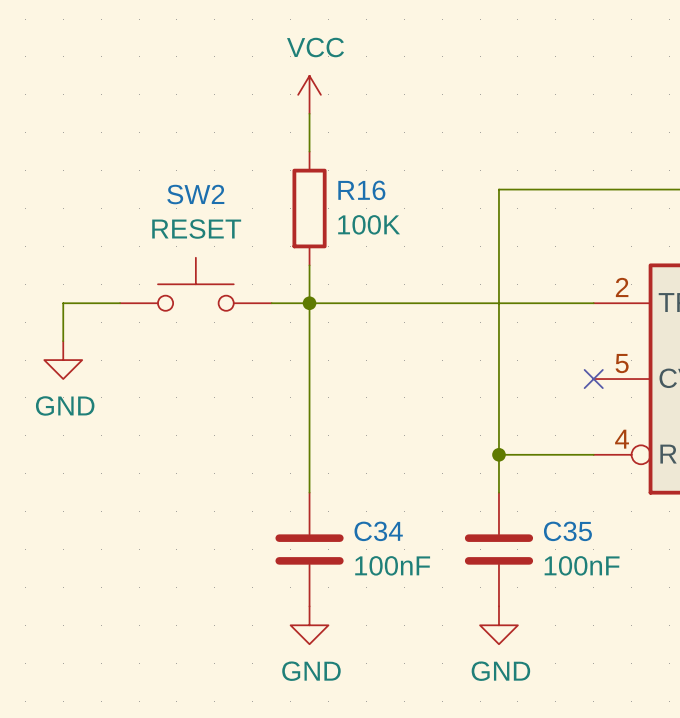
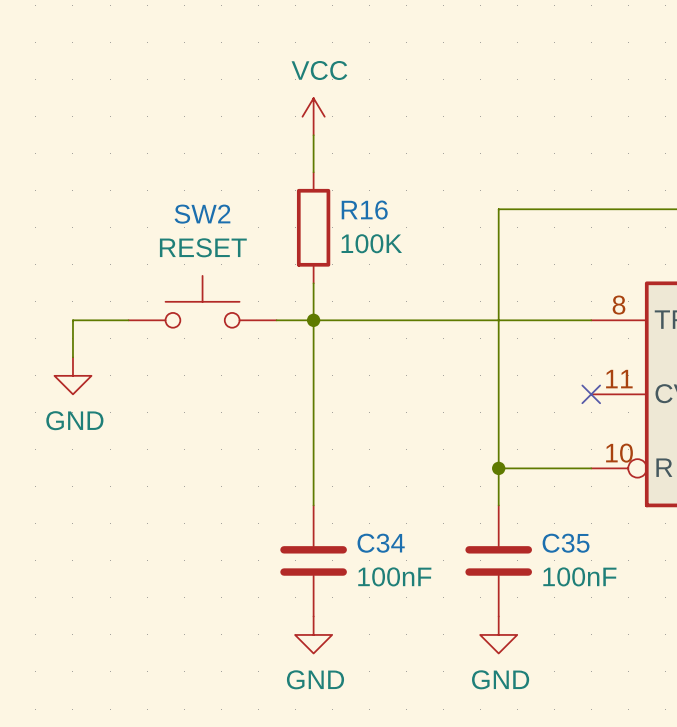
part pin number: 2 (622, 287) -> 8 (619, 305)
part pin number: 5 (622, 363) -> 11 (619, 379)
part pin number: 4 (622, 439) -> 10 (619, 453)

